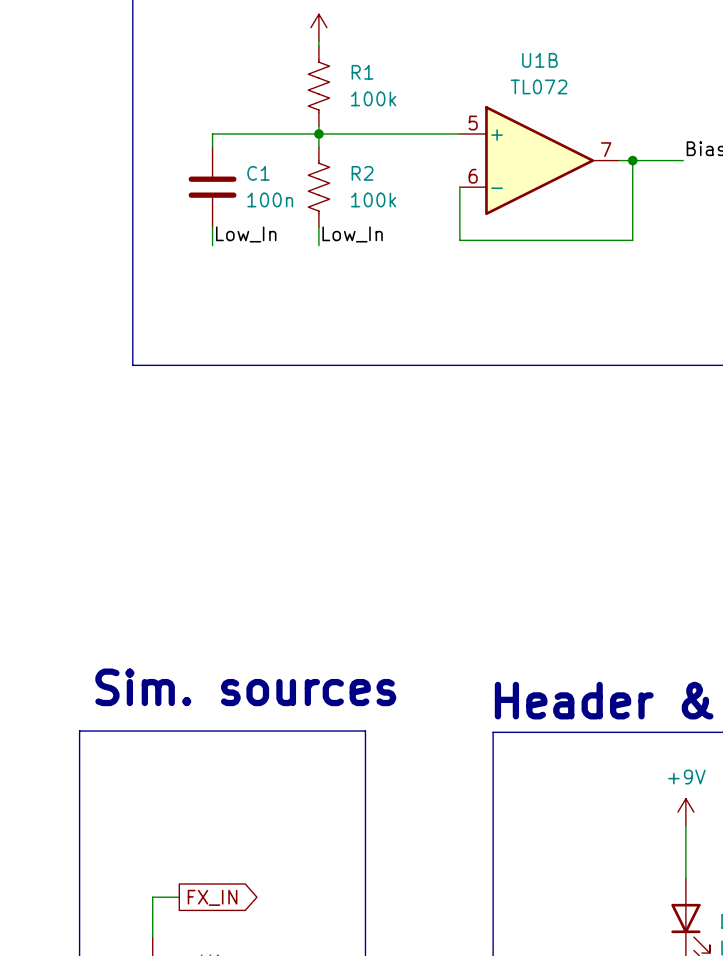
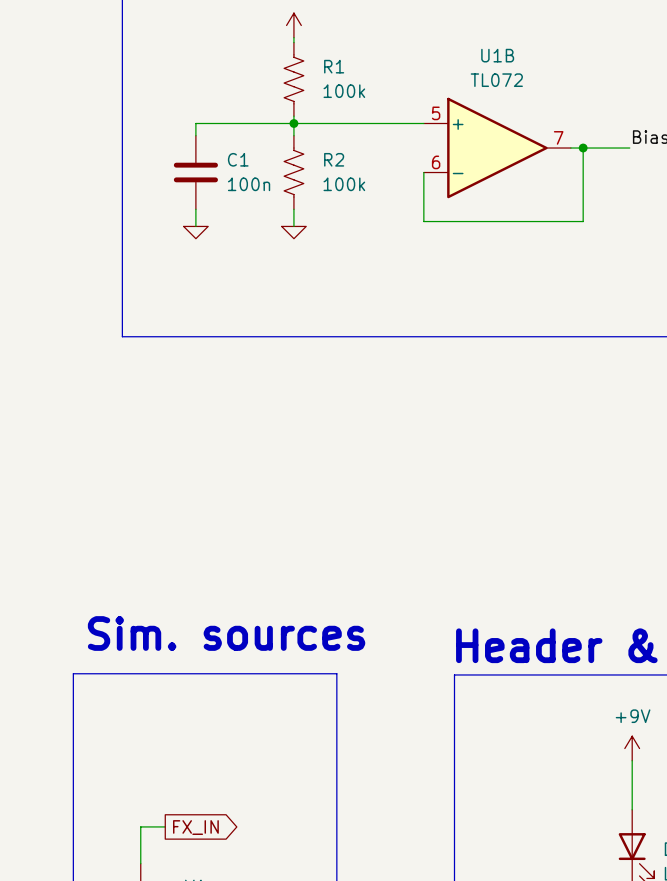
label: Low_In (246, 234) -> none
label: Low_In (352, 234) -> none
power symbol: none -> (195, 232)
power symbol: none -> (293, 232)

